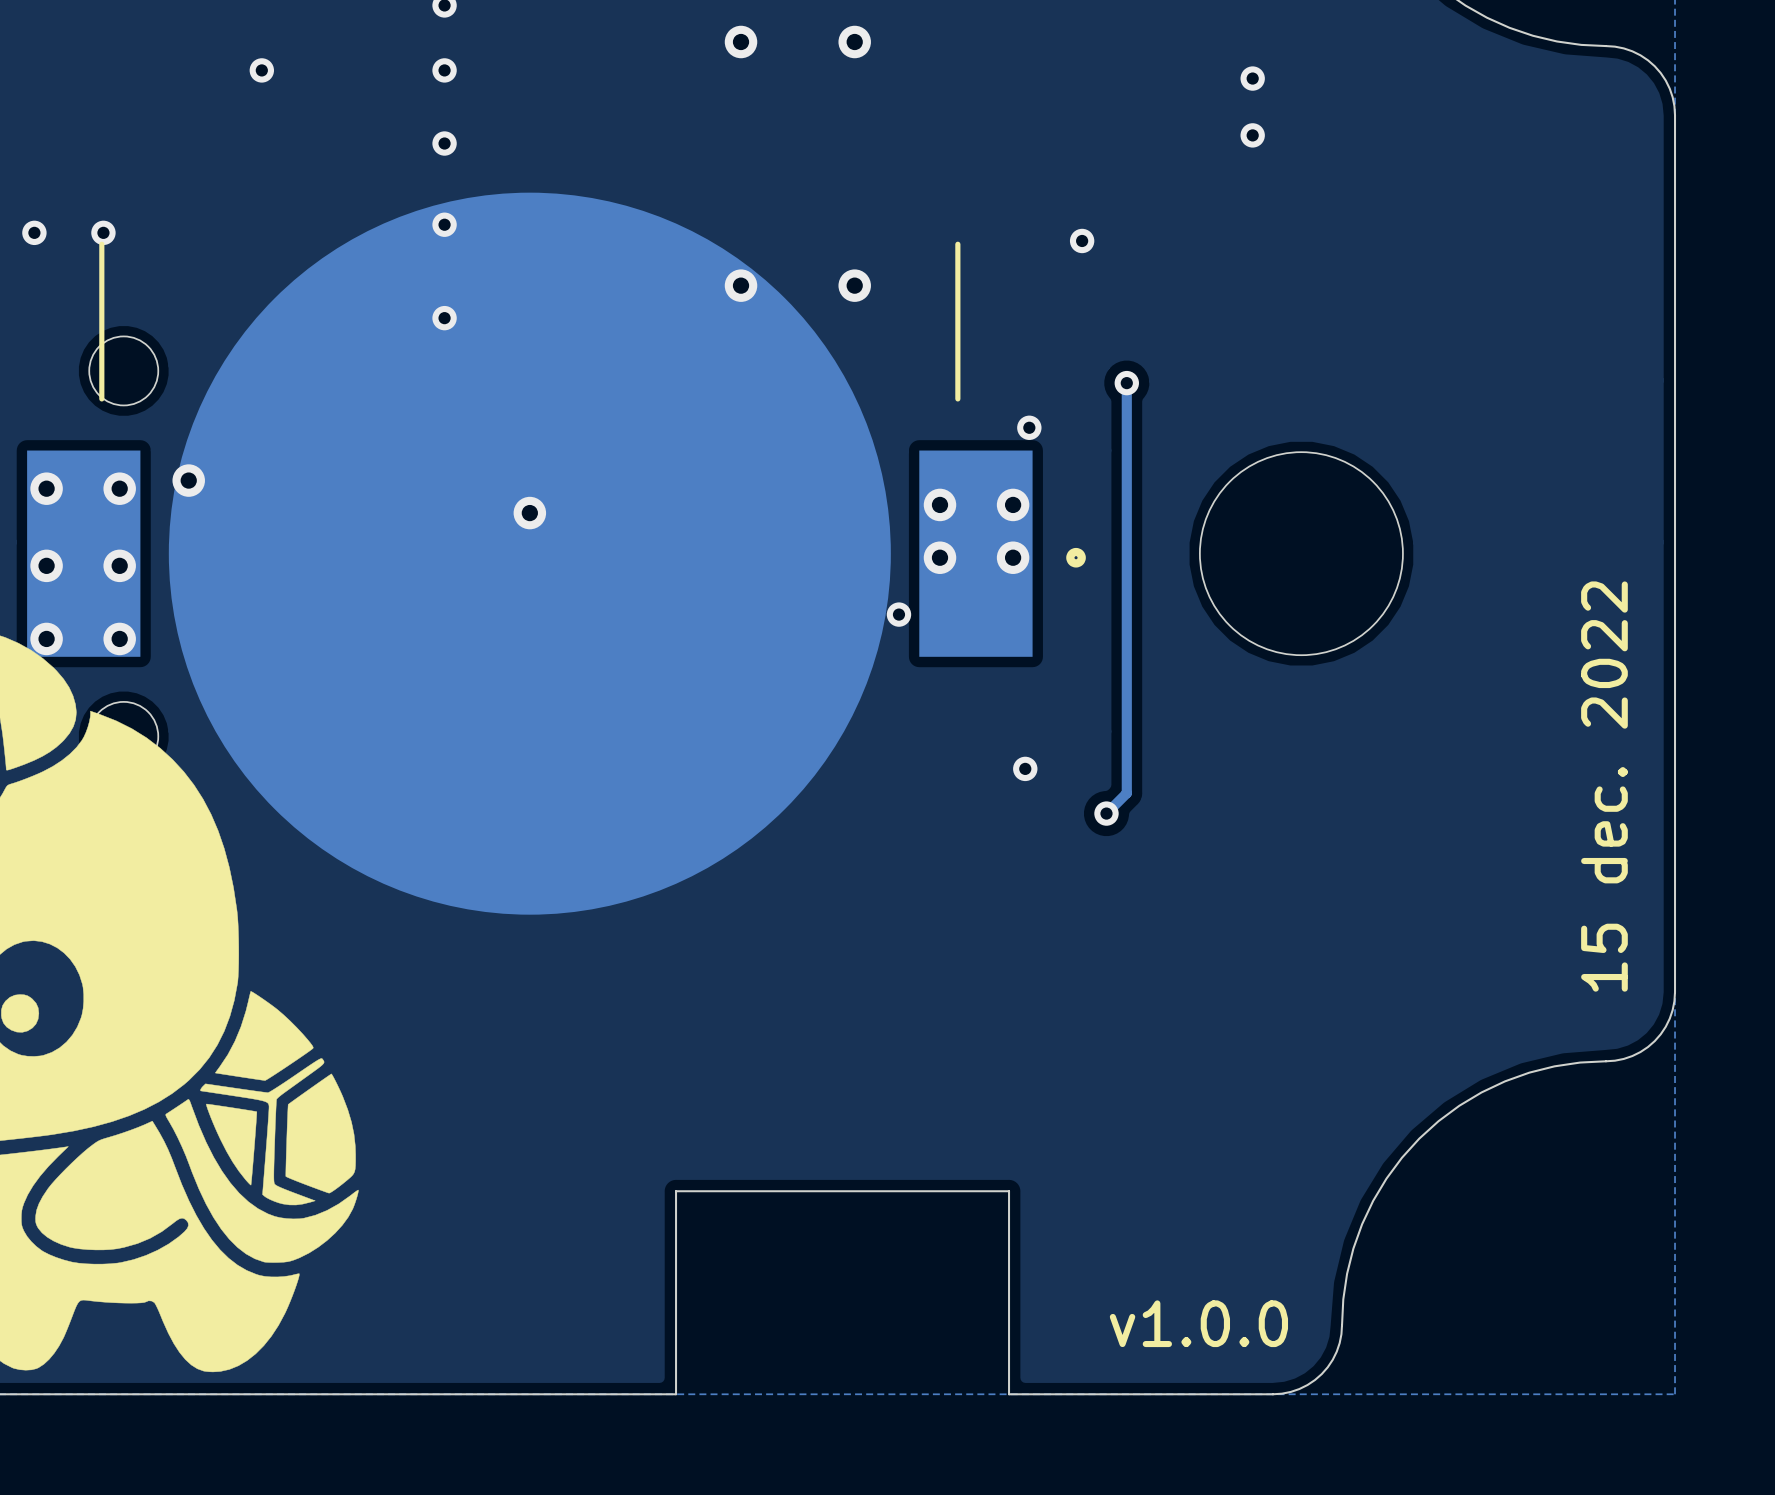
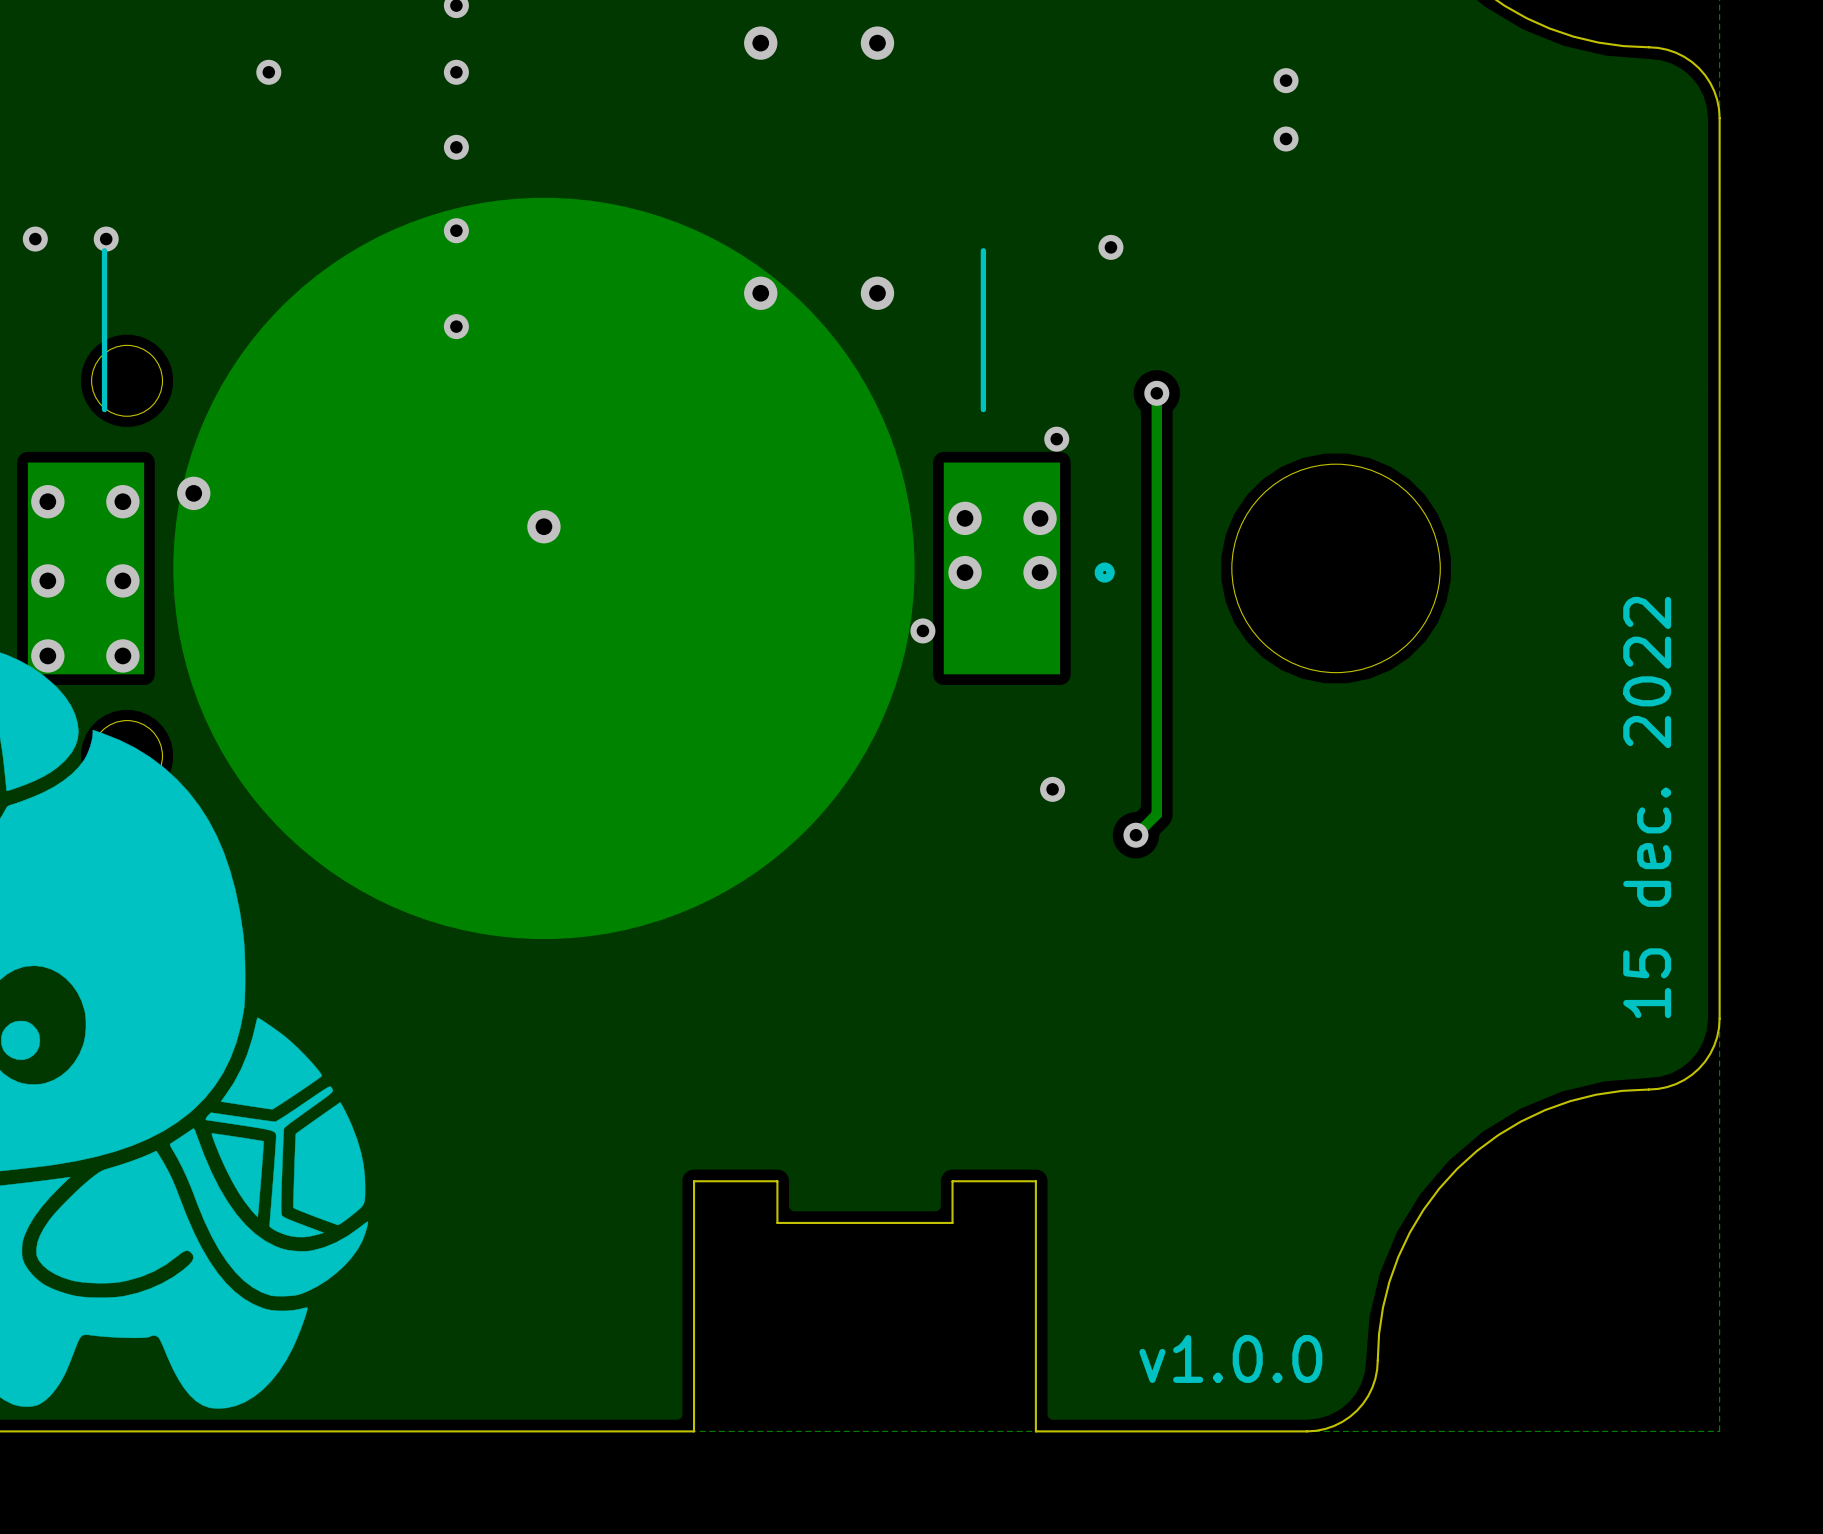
board edge: (757, 1191) (676, 1191) -> (777, 1222) (777, 1181) (694, 1181) (694, 1222)
board edge: (1009, 1191) (927, 1191) -> (1035, 1222) (1035, 1181) (952, 1181) (952, 1222)

